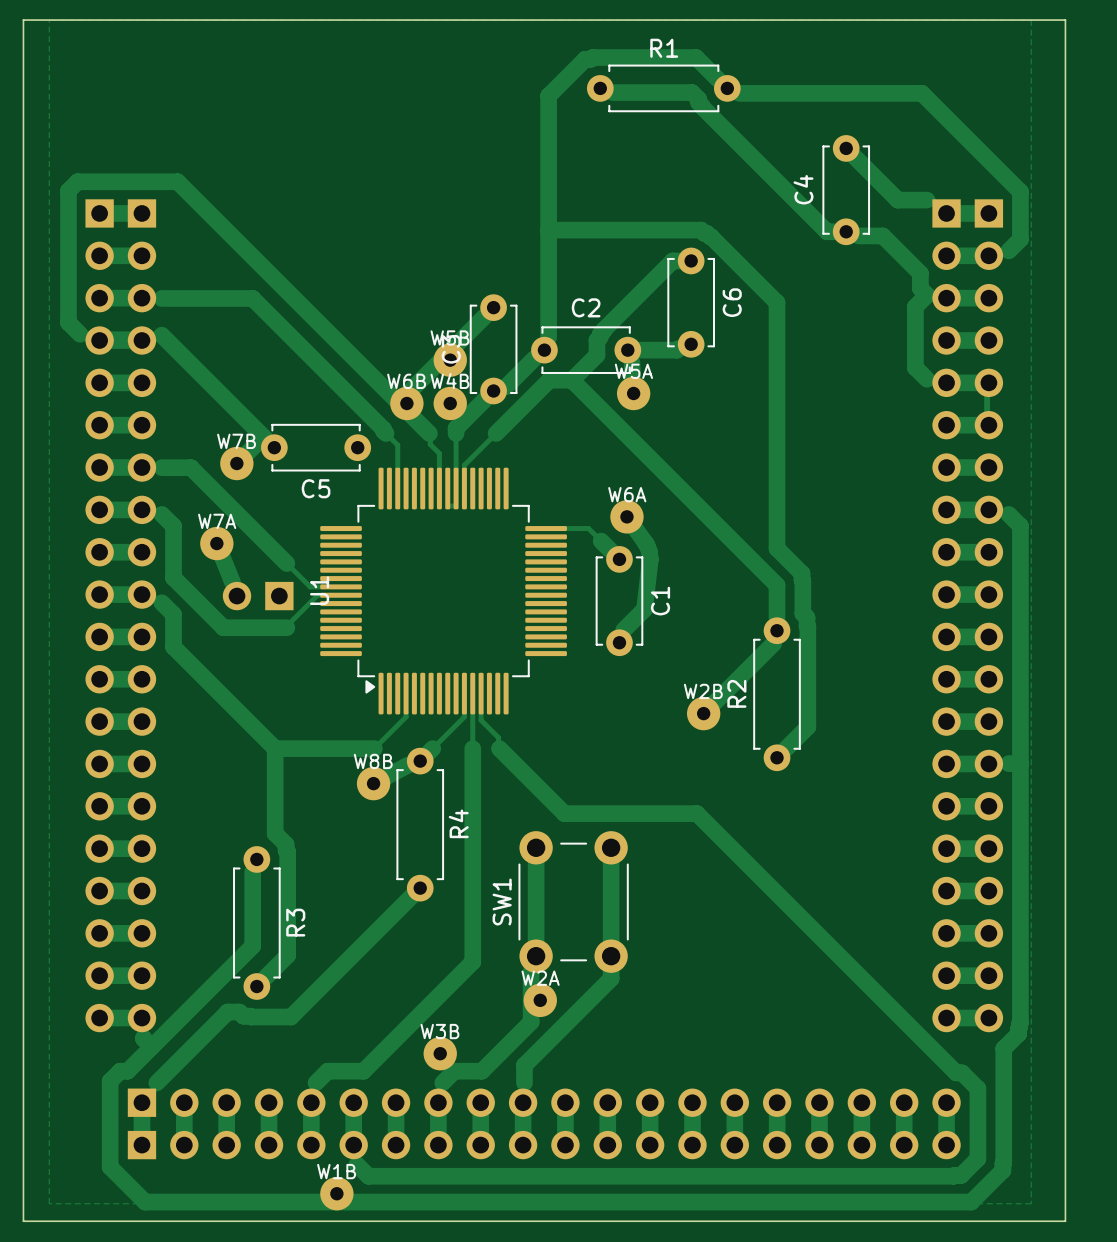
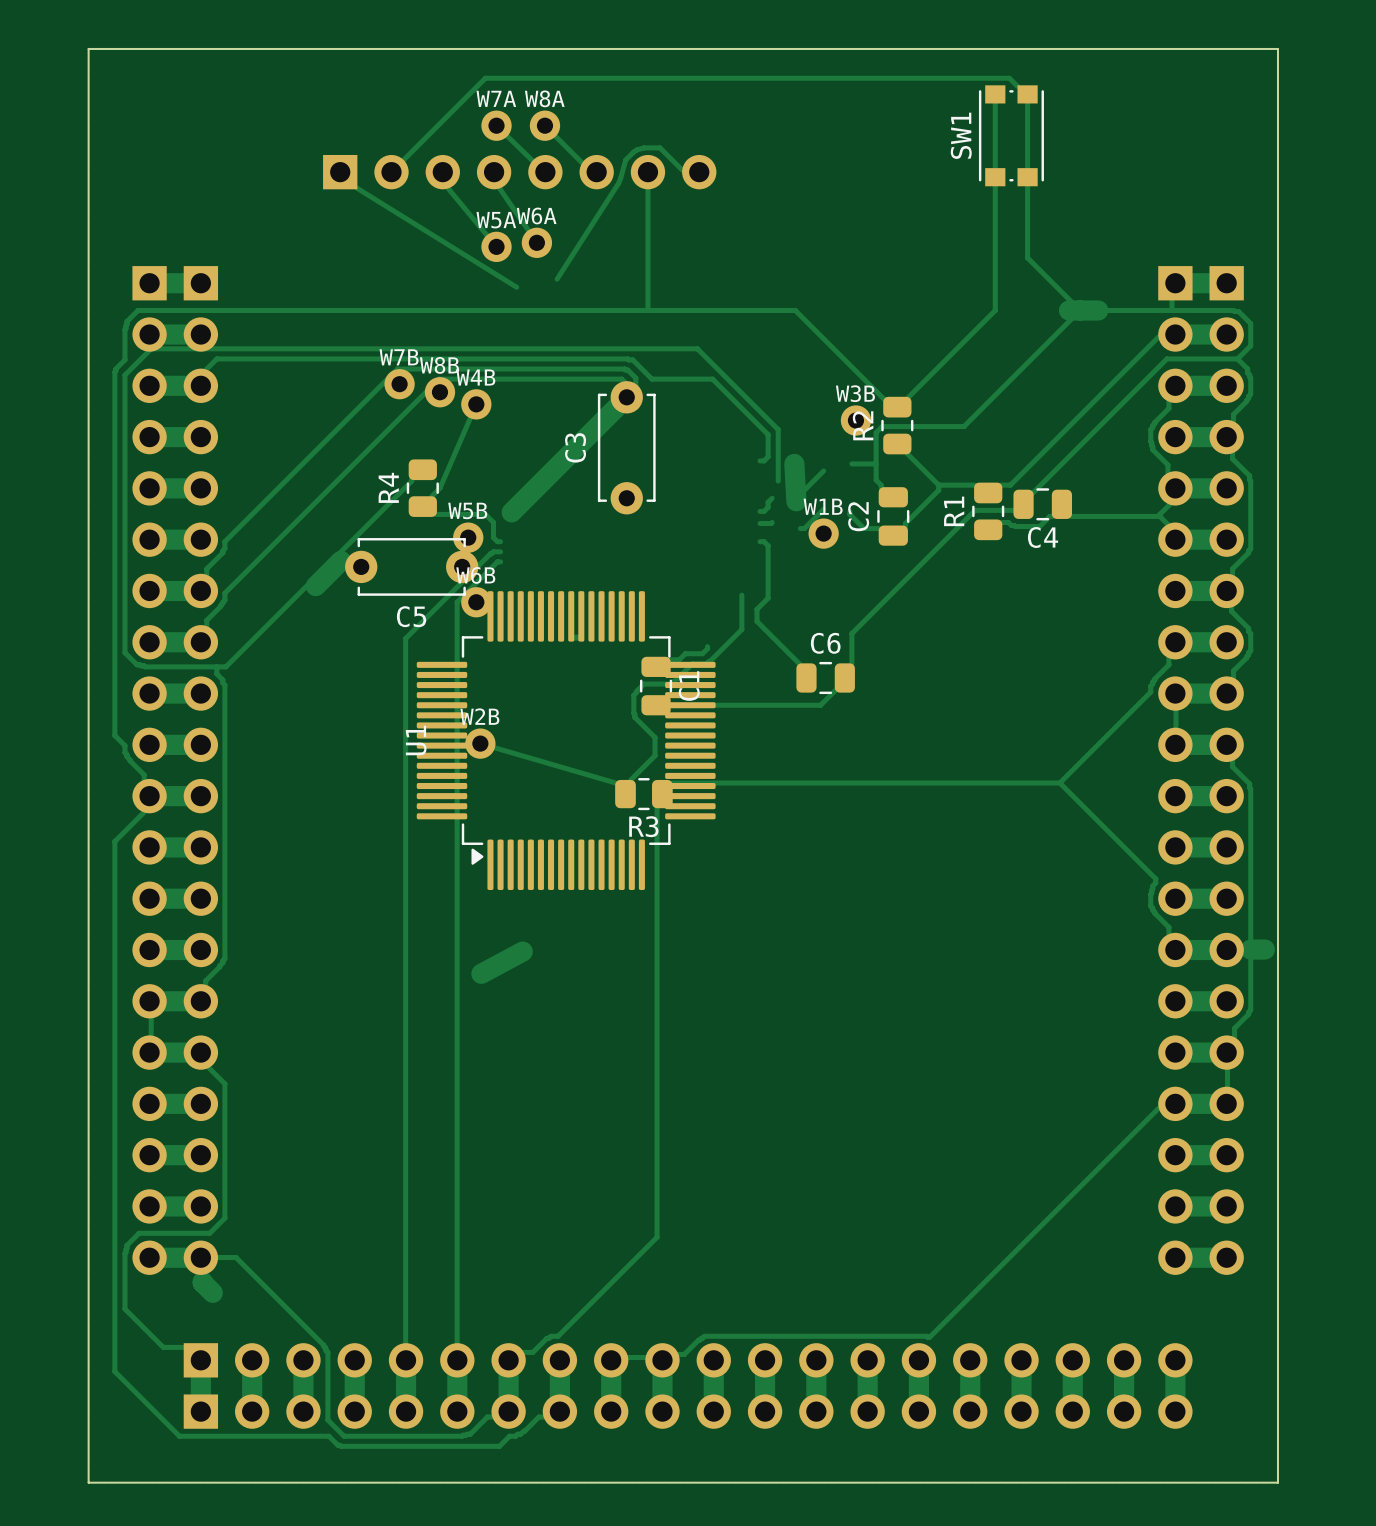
board edge: (49, 20) (23, 20) (23, 1221) (1065, 1221) (1065, 20) (1031, 20) -> (88, 48) (88, 1482) (1277, 1482) (1277, 48)
R1 name position: R1 (664, 48) -> R1 (954, 511)
track: none -> (1017, 86) (1009, 78) (485, 78) (402, 161)
R1 footprint: [586, 64, 741, 113] -> [972, 482, 1005, 541]
track: none -> (995, 103) (995, 168)
track: none -> (1027, 103) (1027, 168)
track: (717, 79) (696, 57) (592, 57) (585, 59) (548, 95) (548, 337) -> none
track: none -> (496, 125) (532, 161)
track: none -> (544, 125) (582, 163)
W8A: none -> (544, 125)
track: (612, 92) (691, 92) (698, 99) (701, 106) (827, 231) (833, 231) -> none
track: (739, 93) (922, 93) (1020, 191) (1020, 239) (1008, 250) (1002, 250) -> none
track: none -> (682, 170) (660, 147) (643, 147) (633, 151) (625, 160) (618, 183) (557, 279)
part: none -> (519, 172)
track: none -> (995, 186) (995, 310) (908, 397)
track: none -> (1027, 186) (1027, 257) (1080, 310) (963, 426) (882, 426) (876, 432) (876, 480) (881, 485) (881, 488)
track: none -> (357, 188) (516, 287)
track: none -> (448, 188) (496, 246)
track: none -> (499, 188) (536, 242)
track: none -> (647, 188) (647, 310)
C4 footprint: [822, 135, 871, 246] -> [1013, 488, 1073, 521]
track: (855, 157) (897, 200) (932, 200) -> none
C4 name position: C4 (803, 189) -> C4 (1043, 537)
track: none -> (1171, 300) (1171, 310)
track: (548, 230) (701, 230) (711, 236) (777, 302) (777, 548) (802, 573) (802, 613) (807, 617) (807, 626) (807, 726) (786, 748) -> none
track: (882, 235) (920, 273) (920, 288) (927, 295) -> (1098, 310) (1238, 311) (1250, 323) (1250, 345) (1237, 358)
C6 footprint: [667, 247, 716, 358] -> [796, 661, 855, 695]
track: none -> (1158, 336) (1010, 485) (1001, 485)
track: (678, 260) (672, 260) (603, 330) (596, 340) (596, 355) (571, 380) -> none
track: none -> (1237, 358) (1166, 358) (1015, 510) (975, 510) (851, 633) (851, 663)
track: none -> (1237, 358) (1247, 369) (1250, 378) (1250, 394) (1246, 401) (1233, 414) (1233, 421)
track: none -> (205, 370) (216, 358) (627, 358) (632, 359) (652, 379) (712, 379) (768, 434) (768, 456) (764, 460) (760, 460)
track: (927, 295) (915, 306) (915, 367) (927, 379) (932, 379) -> none
track: (155, 298) (252, 298) (397, 445) (397, 467) -> none
track: none -> (625, 386) (625, 383) (621, 379) (438, 379) (224, 593) (224, 600) (206, 620) (206, 626)
track: none -> (635, 386) (635, 378) (624, 369) (397, 369) (224, 541) (222, 552) (206, 568) (206, 575)
C6 name position: C6 (732, 302) -> C6 (825, 643)
C2 name position: C2 (586, 307) -> C2 (858, 516)
track: none -> (884, 399) (795, 310) (138, 310) (126, 321) (124, 329) (124, 359) (114, 372) (114, 735) (124, 745) (126, 756) (144, 774) (144, 779)
track: none -> (1168, 401) (1168, 408) (1154, 422) (1150, 429) (1152, 449) (1167, 464) (1167, 473)
track: none -> (476, 404) (439, 488) (431, 496)
C2 footprint: [531, 326, 642, 374] -> [877, 487, 910, 546]
W5B footprint: [433, 343, 467, 377] -> [453, 522, 484, 553]
track: (678, 348) (676, 350) (640, 350) -> none
track: none -> (1232, 452) (1232, 458) (1249, 476) (1250, 481) (1250, 548) (1232, 568) (1232, 575)
track: none -> (907, 453) (938, 485)
track: (534, 358) (506, 386) -> none
track: none -> (851, 463) (876, 463)
track: none -> (823, 471) (804, 490) (800, 490)
track: none -> (411, 479) (225, 666) (145, 666) (137, 664) (124, 652) (124, 375) (151, 348) (697, 348) (778, 429) (778, 481)
W5A footprint: [616, 376, 651, 411] -> [481, 231, 512, 263]
track: (571, 380) (777, 585) (777, 617) -> none
track: (571, 380) (549, 380) (464, 465) (464, 467) -> none
track: none -> (938, 485) (975, 485)
track: none -> (938, 485) (938, 490) (905, 523) (905, 526)
W6B footprint: [390, 386, 424, 421] -> [461, 587, 492, 618]
W4B footprint: [433, 386, 467, 421] -> [461, 389, 492, 420]
track: none -> (772, 498) (768, 502) (768, 507) (764, 511) (760, 511)
track: none -> (1169, 504) (1159, 516)
track: (987, 396) (987, 411) -> (1176, 710) (1176, 728)
track: (484, 400) (456, 428) (456, 467) -> none
track: none -> (823, 509) (804, 528) (800, 528)
track: none -> (849, 511) (849, 514) (864, 528) (879, 528)
track: none -> (435, 514) (485, 514) (493, 522) (493, 537) (497, 541) (500, 541)
track: none -> (1052, 516) (1049, 516) (1039, 526) (1015, 526) (1008, 522) (1001, 522)
track: none -> (1071, 516) (1159, 516)
track: none -> (1159, 516) (1167, 524)
track: none -> (772, 522) (760, 523)
track: none -> (760, 541) (764, 541) (768, 545) (768, 598) (757, 609) (757, 621) (799, 663)
track: none -> (500, 551) (490, 553) (405, 638) (405, 1343)
track: (265, 438) (160, 334) (80, 334) (68, 322) (68, 190) (77, 181) (177, 181) (430, 434) (430, 444) (439, 453) (439, 467) -> none
track: none -> (500, 561) (497, 561) (457, 602) (457, 1343)
W7B footprint: [220, 446, 254, 481] -> [384, 369, 415, 400]
track: (155, 467) (191, 467) (310, 586) (321, 586) -> none
track: none -> (741, 595) (741, 629) (709, 661) (706, 663) (692, 663) (671, 684) (643, 684) (633, 695) (634, 717) (655, 737) (655, 755) (630, 779)
track: none -> (1231, 607) (1231, 611) (1248, 628) (1250, 633) (1250, 650) (1246, 657) (1233, 670) (1233, 677)
W6A footprint: [610, 500, 644, 534] -> [521, 227, 553, 258]
track: none -> (707, 646) (702, 653) (685, 653) (679, 659) (670, 659)
track: (155, 514) (161, 514) (173, 526) (173, 577) (223, 627) (287, 627) (288, 624) (317, 595) (321, 595) -> none
track: (1002, 514) (1008, 514) (1020, 526) (1020, 1022) (1018, 1033) (1003, 1048) (1002, 1170) (971, 1202) (145, 1202) (110, 1167) (110, 1081) (120, 1071) (127, 1071) (252, 946) (252, 871) -> none
track: (626, 516) (646, 545) (650, 559) (644, 609) (623, 630) -> none
track: none -> (1168, 657) (1168, 664) (1154, 678) (1150, 686) (1150, 692) (1059, 782)
W7A footprint: [200, 526, 234, 561] -> [481, 110, 512, 141]
track: (566, 528) (588, 528) (610, 550) -> none
track: none -> (216, 666) (216, 673) (224, 685) (224, 958) (205, 980) (205, 984)
track: (216, 543) (232, 582) -> none
C1 footprint: [595, 546, 644, 657] -> [639, 656, 673, 716]
track: none -> (835, 690) (820, 705) (670, 705)
track: none -> (480, 743) (615, 782)
part: (258, 596) -> none
track: (155, 599) (158, 599) (173, 614) (173, 646) (275, 748) -> none
track: none -> (1232, 760) (1232, 766) (1249, 783) (1250, 789) (1250, 1010) (1234, 1028) (1234, 1037)
R2 footprint: [753, 617, 801, 772] -> [881, 396, 914, 455]
track: none -> (672, 782) (1059, 782)
track: none -> (1059, 782) (1155, 878) (1150, 894) (1150, 906) (1154, 913) (1168, 927) (1168, 934)
track: (773, 643) (703, 713) -> none
track: none -> (657, 808) (657, 1237) (558, 1336) (547, 1338) (532, 1352) (523, 1352)
track: none -> (144, 812) (114, 841) (114, 1371) (179, 1436) (328, 1436) (341, 1446) (499, 1446) (509, 1436) (520, 1434) (538, 1417) (543, 1417)
W2B footprint: [686, 696, 721, 731] -> [465, 728, 496, 759]
track: (406, 713) (406, 716) (374, 748) (275, 748) -> none
track: (464, 713) (464, 716) (429, 751) -> none
track: (472, 713) (472, 962) (363, 1071) (327, 1071) (316, 1082) (316, 1089) -> none
track: (481, 713) (481, 720) (498, 737) (498, 747) (564, 813) (696, 813) (956, 1072) (962, 1072) (977, 1088) (977, 1158) (961, 1175) (953, 1176) (368, 1176) (356, 1164) (356, 1158) -> none
R4 footprint: [396, 747, 445, 902] -> [406, 459, 439, 517]
track: (275, 748) (275, 833) (286, 844) (287, 851) (287, 955) (266, 977) -> none
W8B footprint: [356, 766, 391, 801] -> [424, 377, 456, 408]
track: none -> (151, 1018) (151, 1036)
R4 name position: R4 (458, 823) -> R4 (388, 487)
SW1 footprint: [518, 831, 629, 973] -> [978, 85, 1044, 187]
R3 footprint: [233, 846, 281, 1000] -> [615, 778, 673, 811]
track: none -> (208, 1067) (224, 1083) (224, 1218) (209, 1233) (139, 1233) (126, 1245) (124, 1253) (124, 1309) (163, 1347) (184, 1347)
track: none -> (1227, 1068) (1227, 1086)
track: (536, 863) (536, 940) -> none
track: (611, 863) (611, 940) -> none
track: none -> (1158, 1108) (929, 1337) (704, 1336) (684, 1354) (678, 1354)
track: (411, 896) (291, 1017) (251, 1017) (243, 1016) (239, 1012) (227, 1012) (155, 1083) (155, 1088) -> none
R3 name position: R3 (295, 922) -> R3 (643, 826)
track: (531, 972) (531, 1022) (481, 1071) (454, 1071) (442, 1082) (442, 1089) -> none
track: (611, 972) (611, 978) (524, 1065) (524, 1088) -> none
W2A: (540, 1000) -> none
track: none -> (217, 1257) (236, 1257) (323, 1345) (327, 1352) (327, 1420) (344, 1436) (462, 1436) (470, 1434) (487, 1417) (492, 1417)
W3B footprint: [423, 1037, 457, 1071] -> [840, 405, 872, 436]
track: none -> (627, 1357) (645, 1357)
W1B footprint: [320, 1177, 354, 1211] -> [808, 518, 839, 549]

